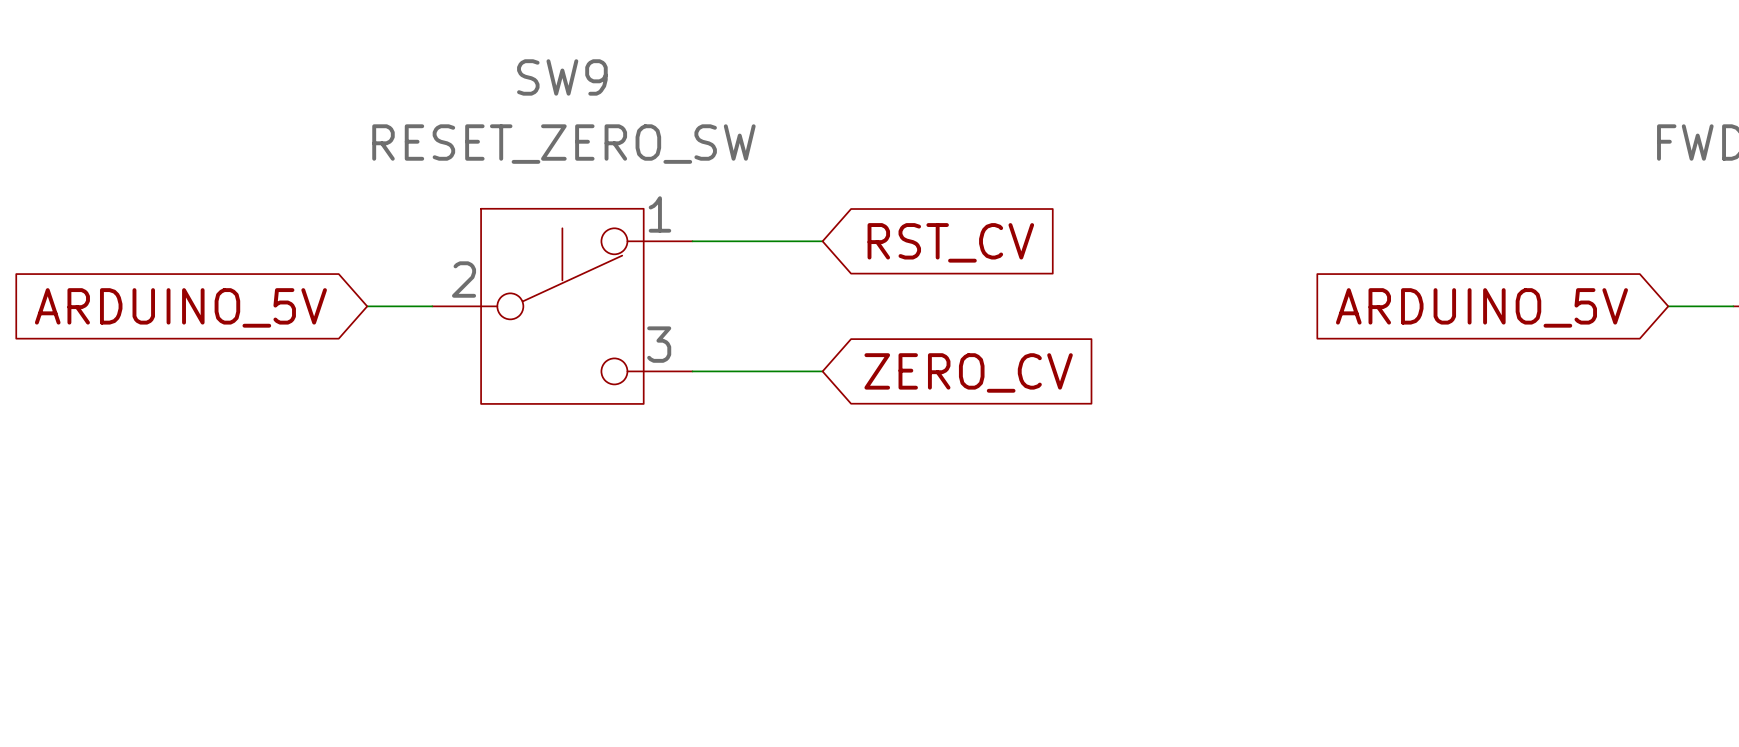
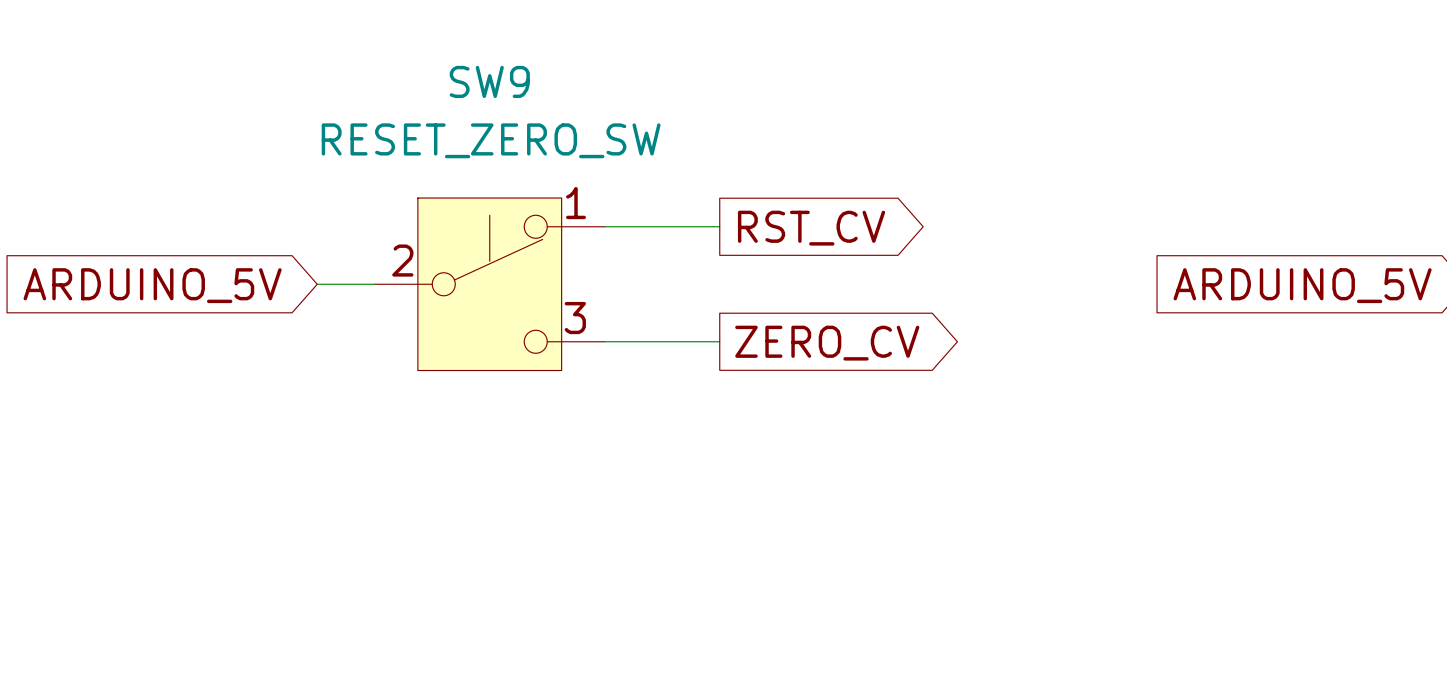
global label shape: input (950, 242) -> output (811, 228)
global label shape: input (968, 372) -> output (827, 343)

